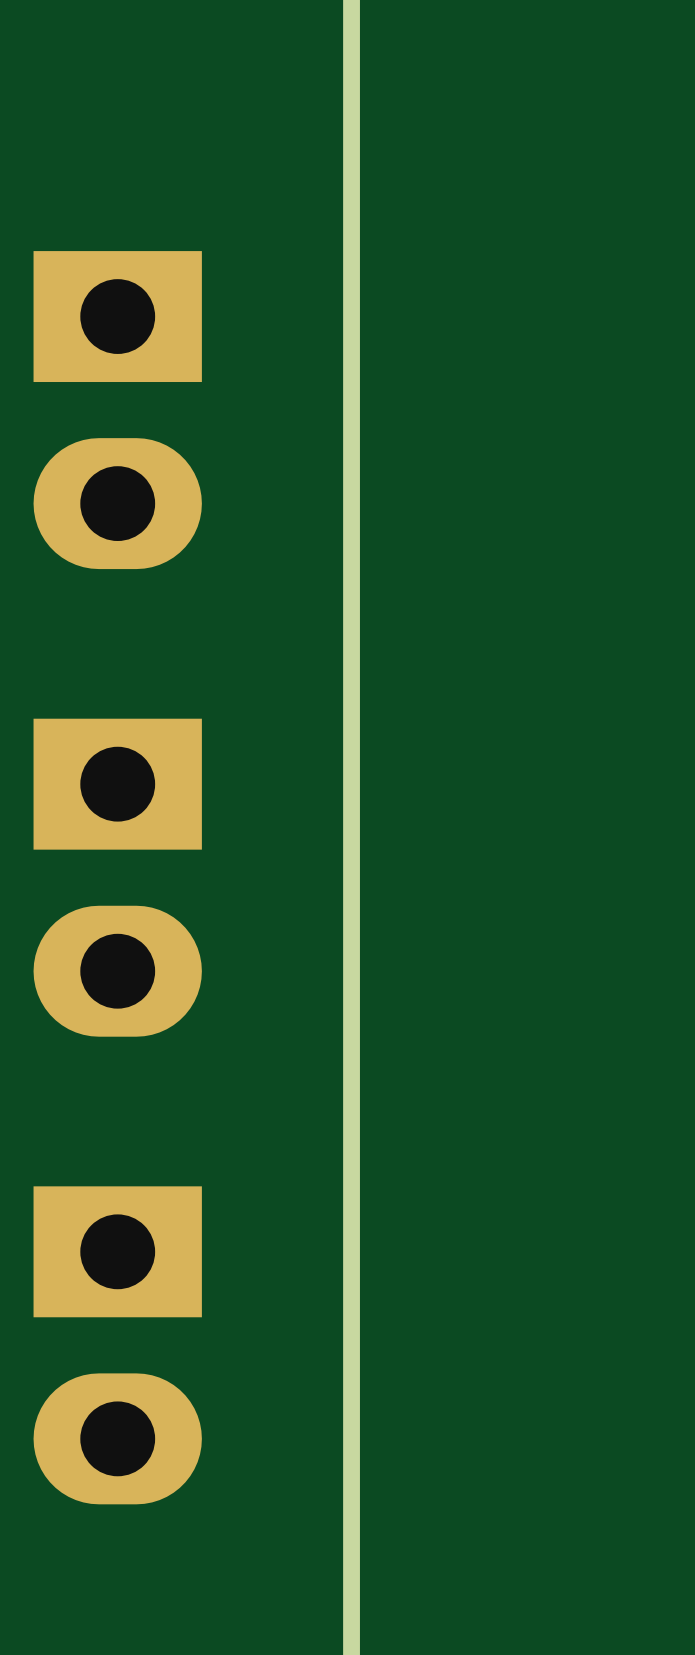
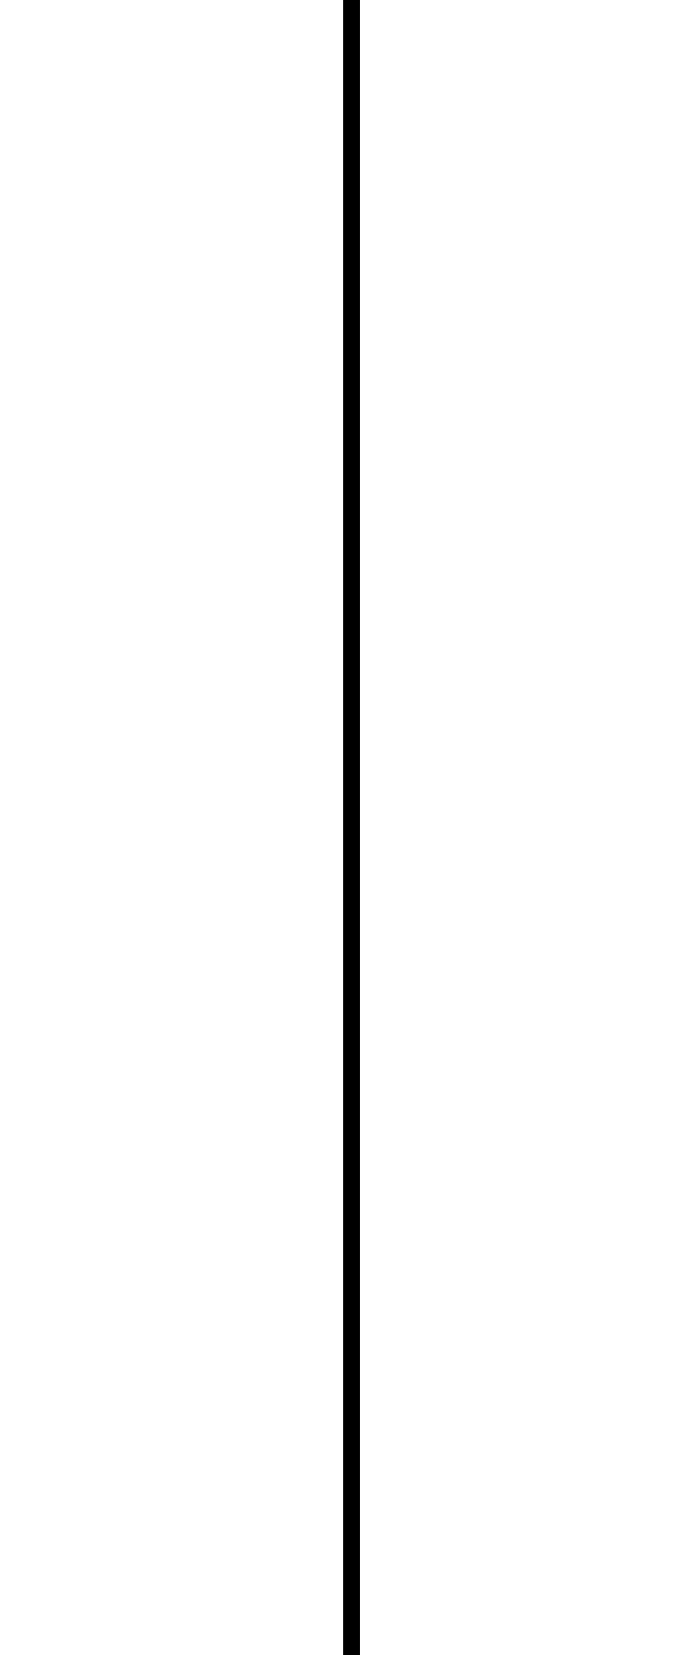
part: (117, 410) -> none
part: (117, 877) -> none
part: (117, 1345) -> none

